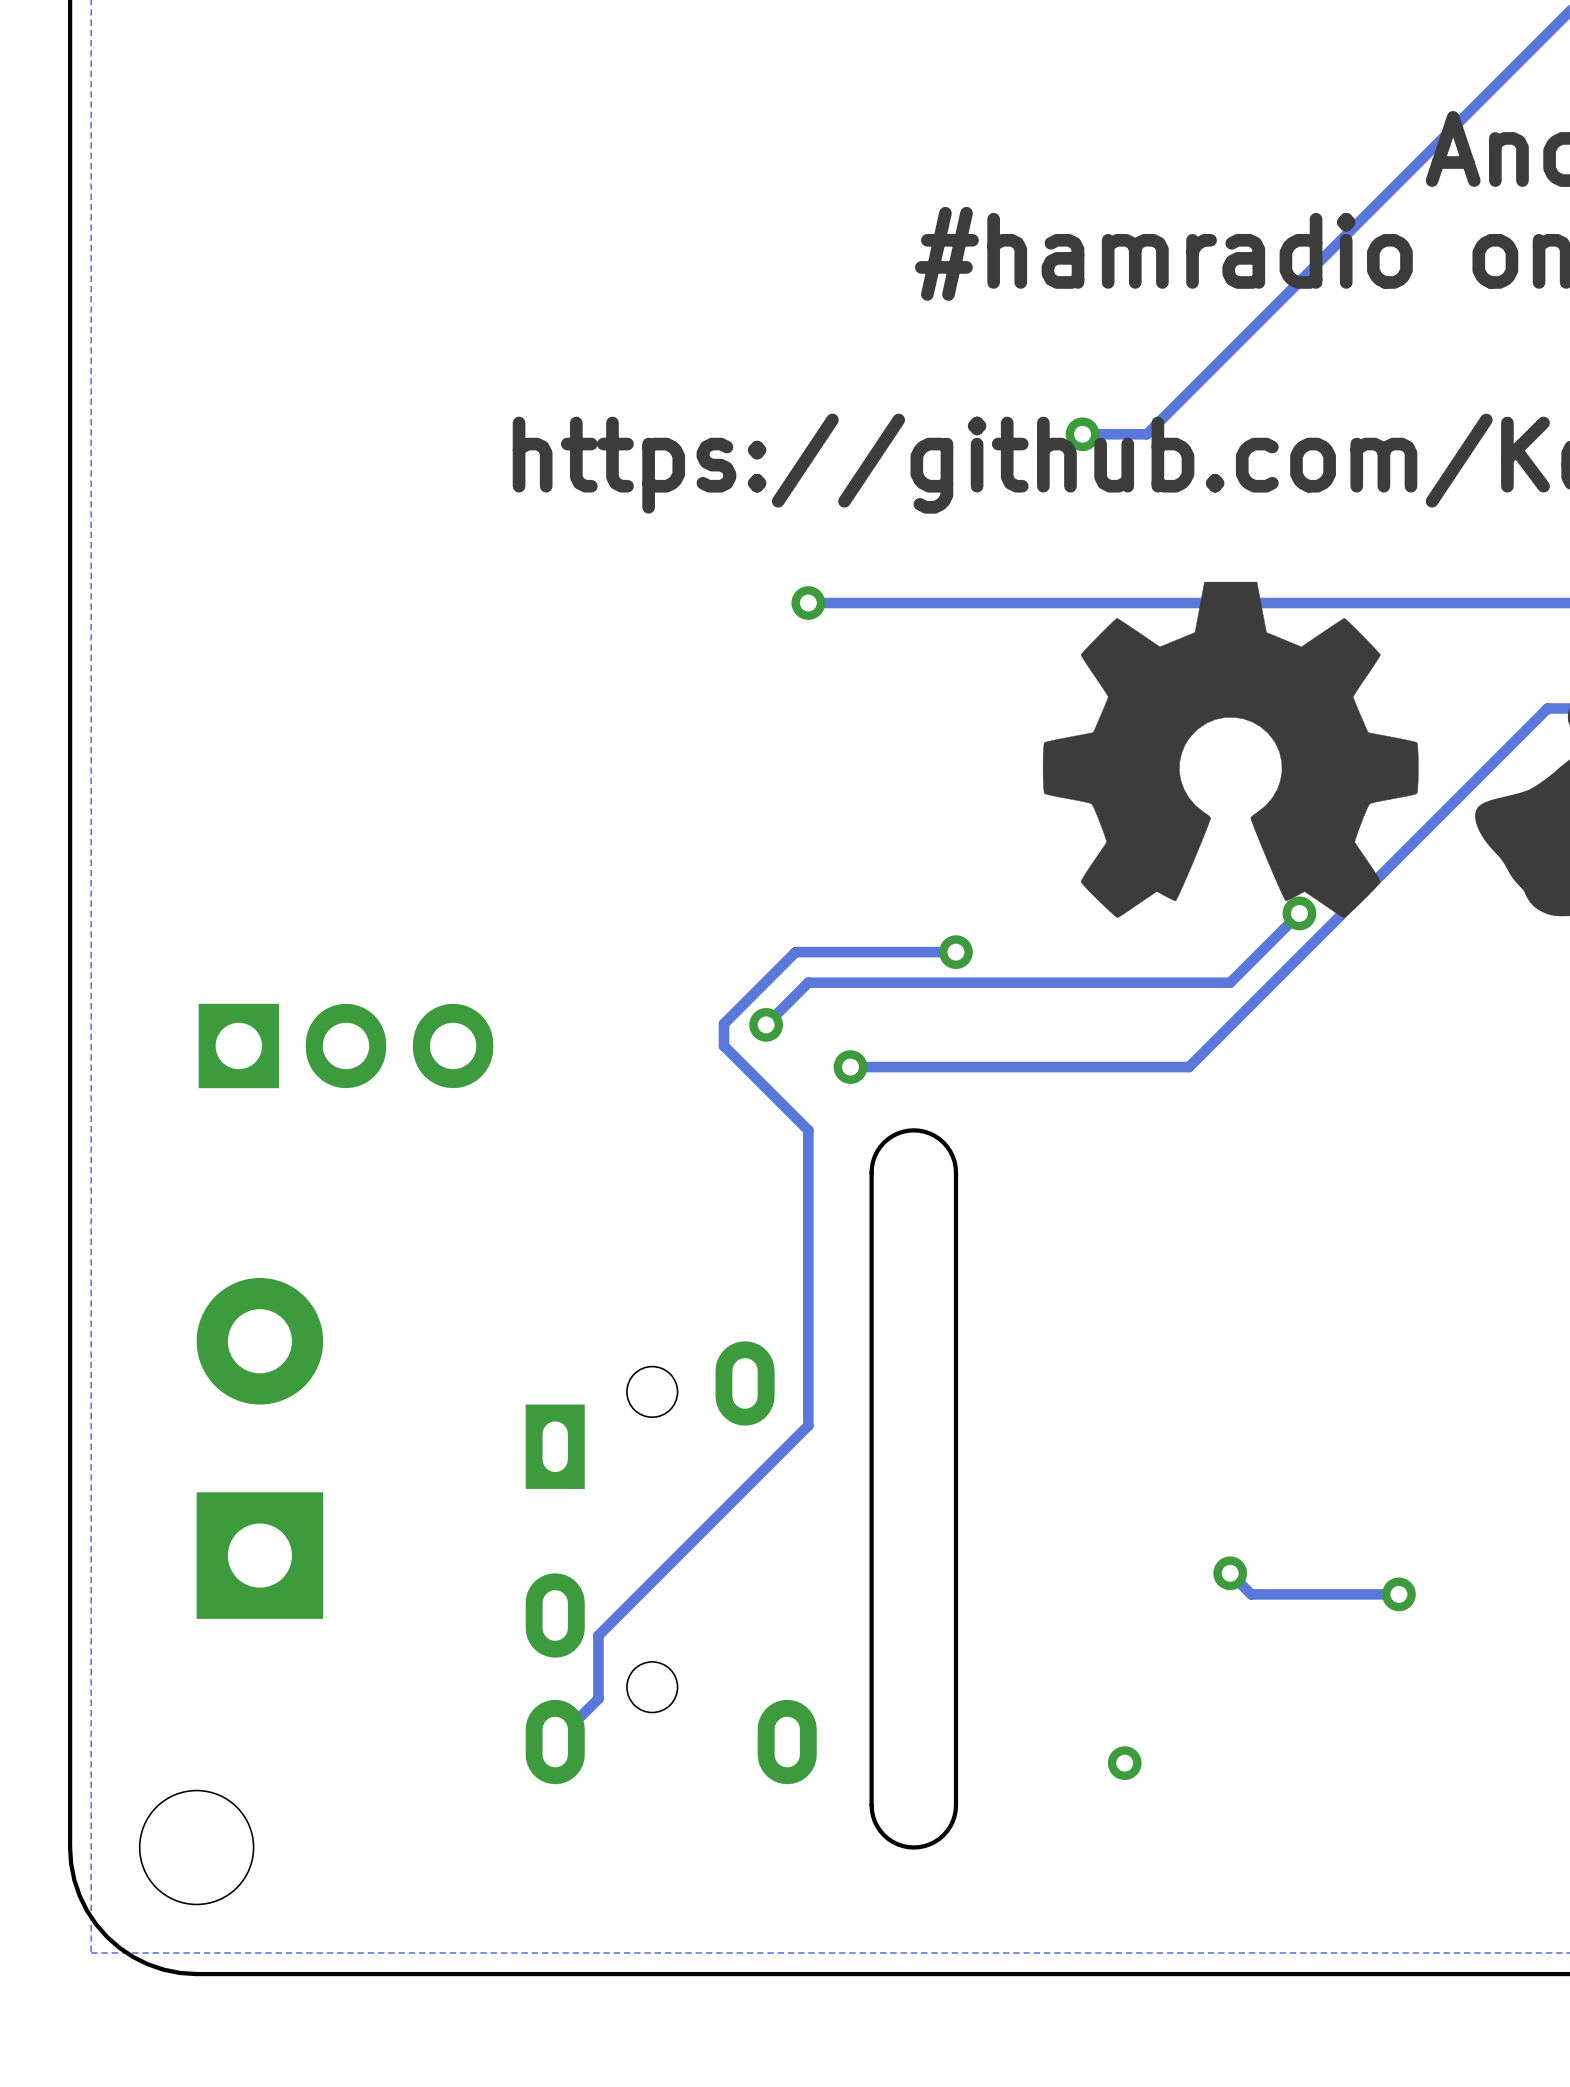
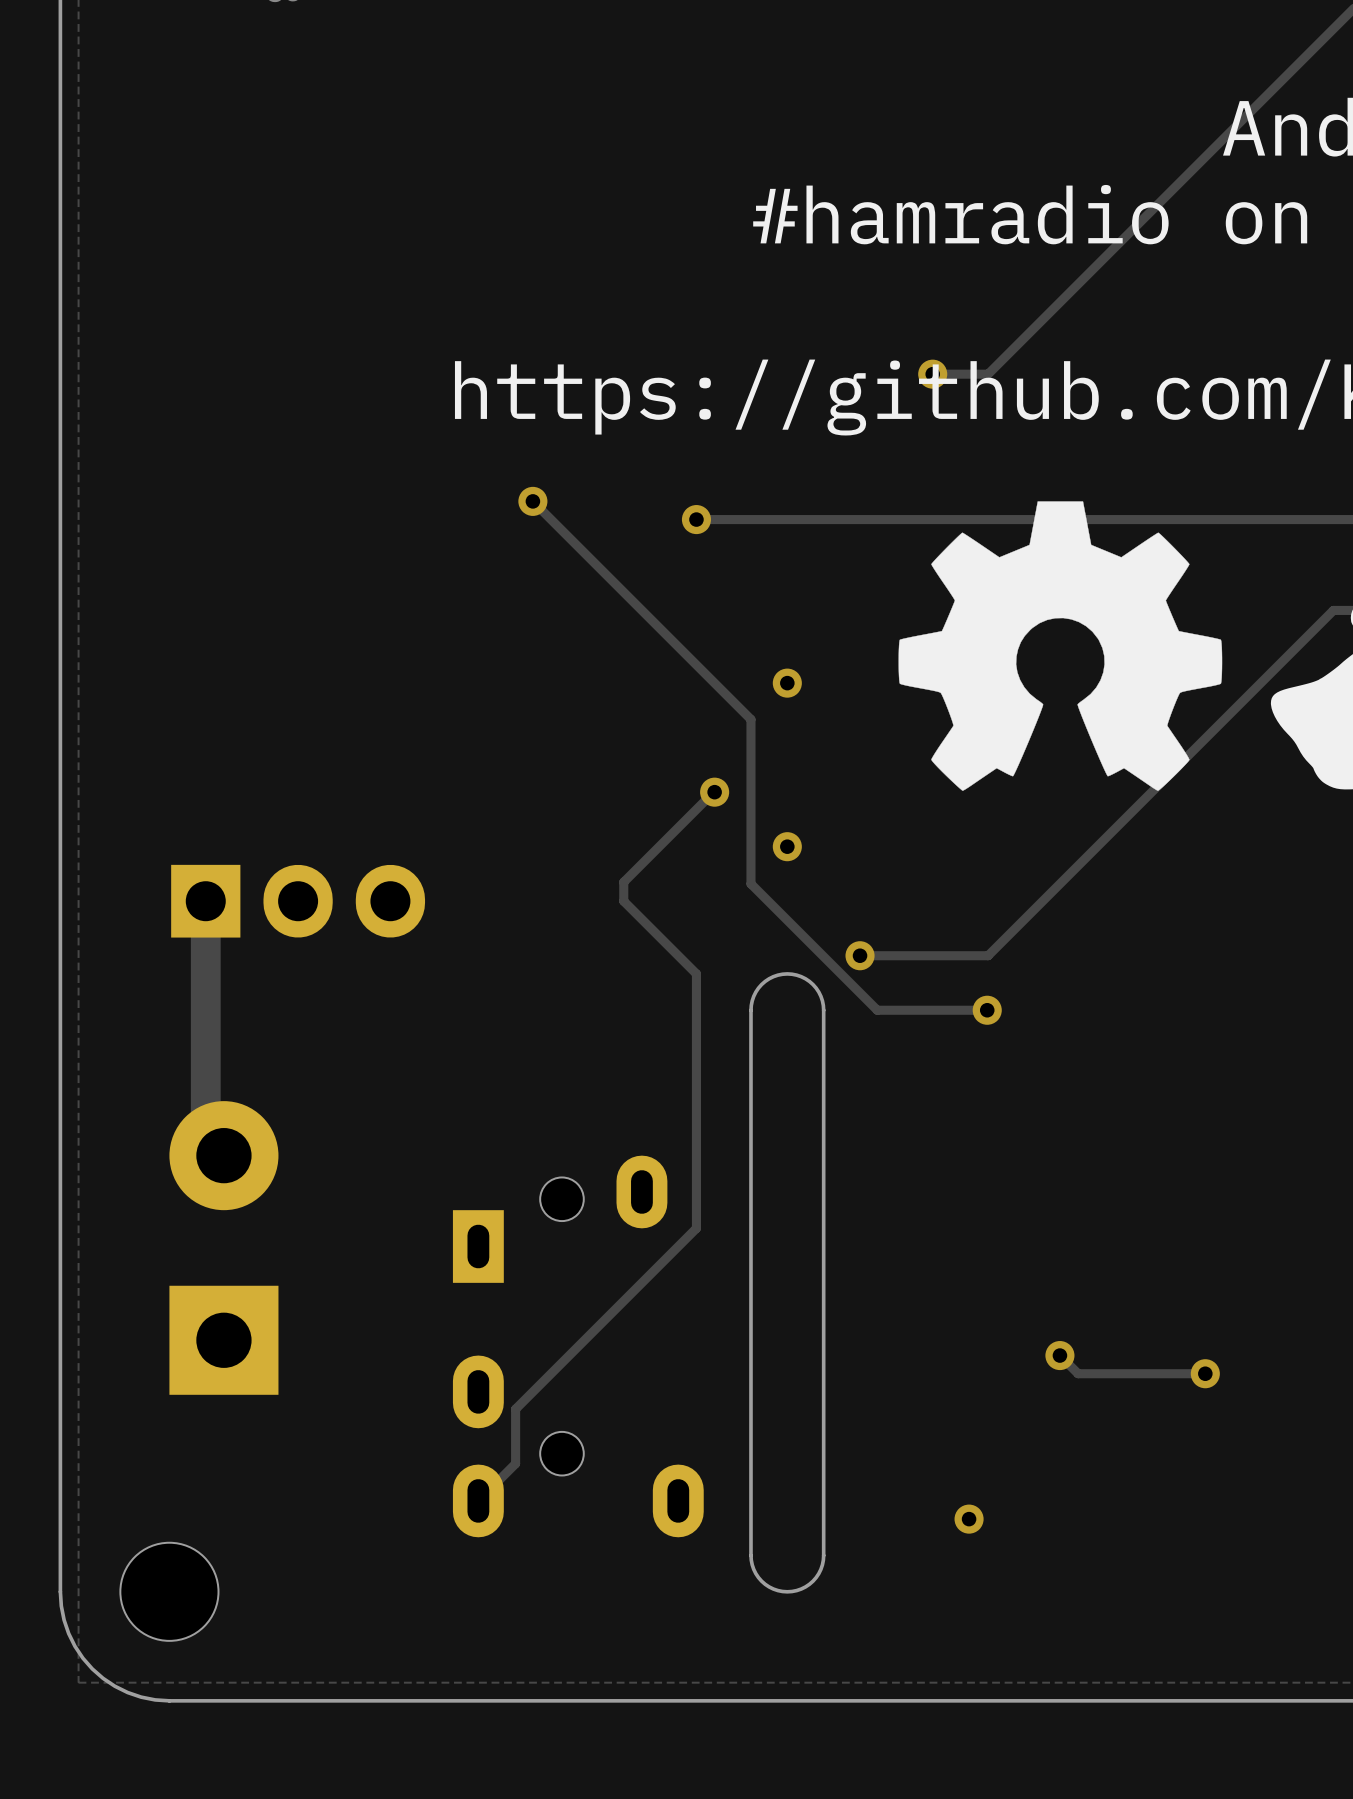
track: none -> (532, 501) (750, 719) (750, 883) (877, 1010) (987, 1010)
via: none -> (532, 501)
via: none -> (787, 683)
track: (1299, 913) (1230, 982) (808, 982) (766, 1024) -> none
via: (1299, 913) -> none
via: none -> (714, 792)
track: (955, 952) (795, 952) -> (714, 792) (685, 820)
via position: (955, 952) -> (787, 846)
via: (766, 1024) -> none
track: none -> (205, 901) (205, 1137) (223, 1155)
via: (850, 1067) -> none
track: (1189, 1067) (850, 1067) -> (1024, 919) (988, 955) (860, 955)
via: none -> (860, 955)
via: none -> (987, 1010)

